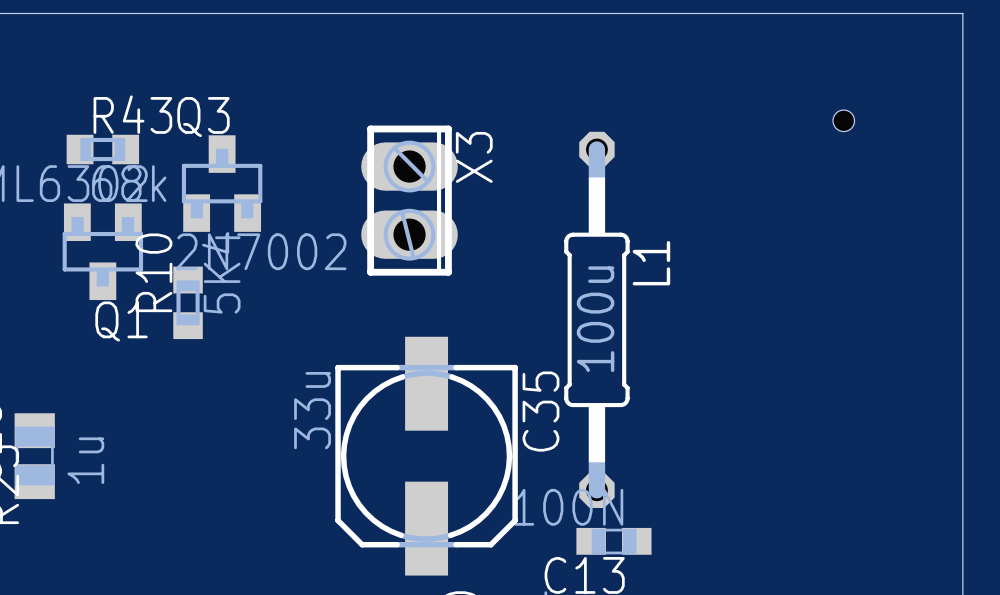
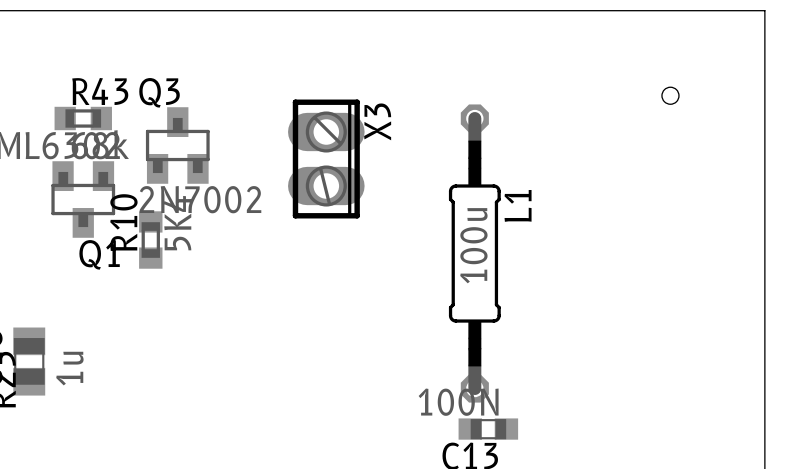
C35: 33u (426, 456) -> none

